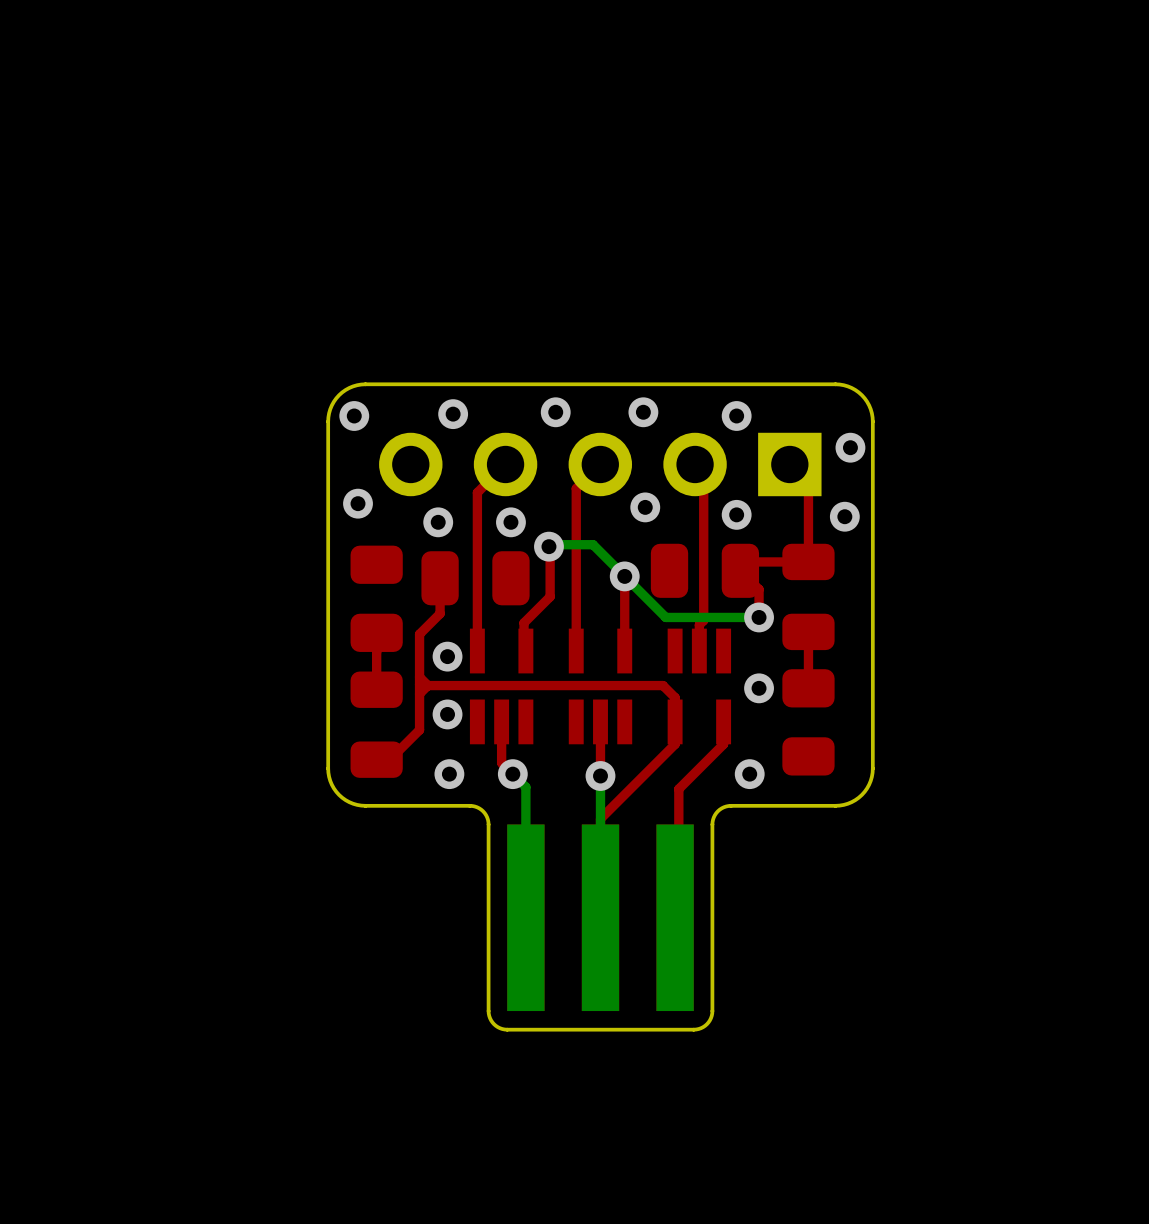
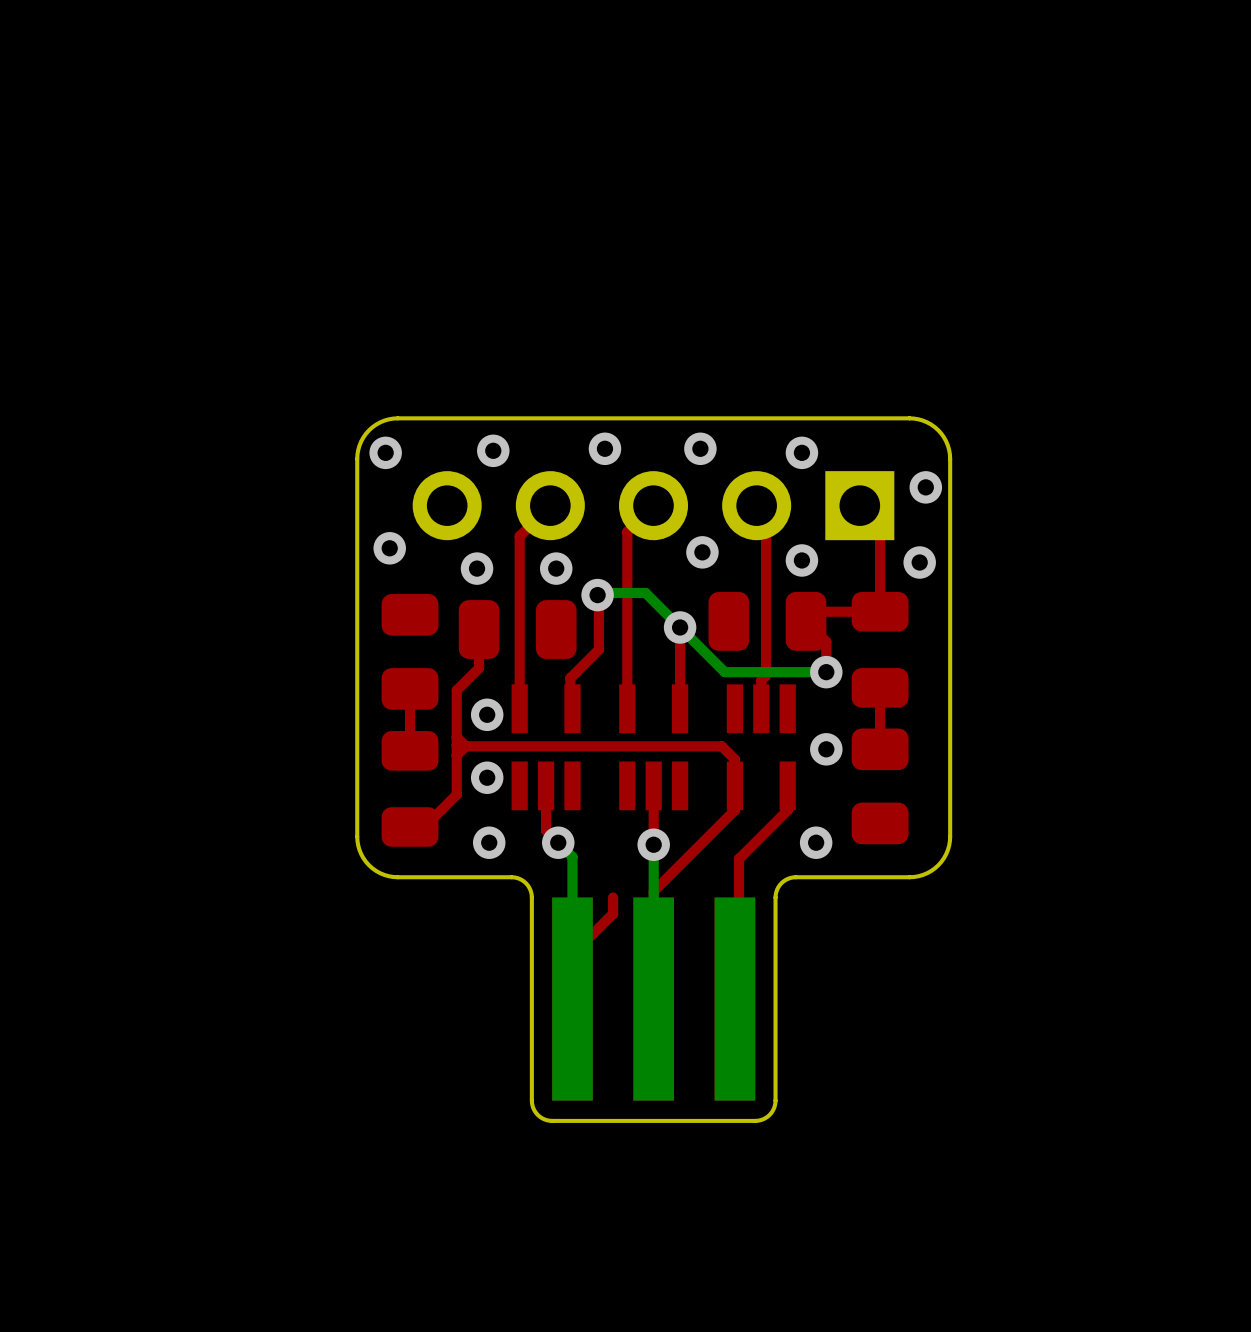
top track: none -> (613, 897) (613, 913) (572, 954)

